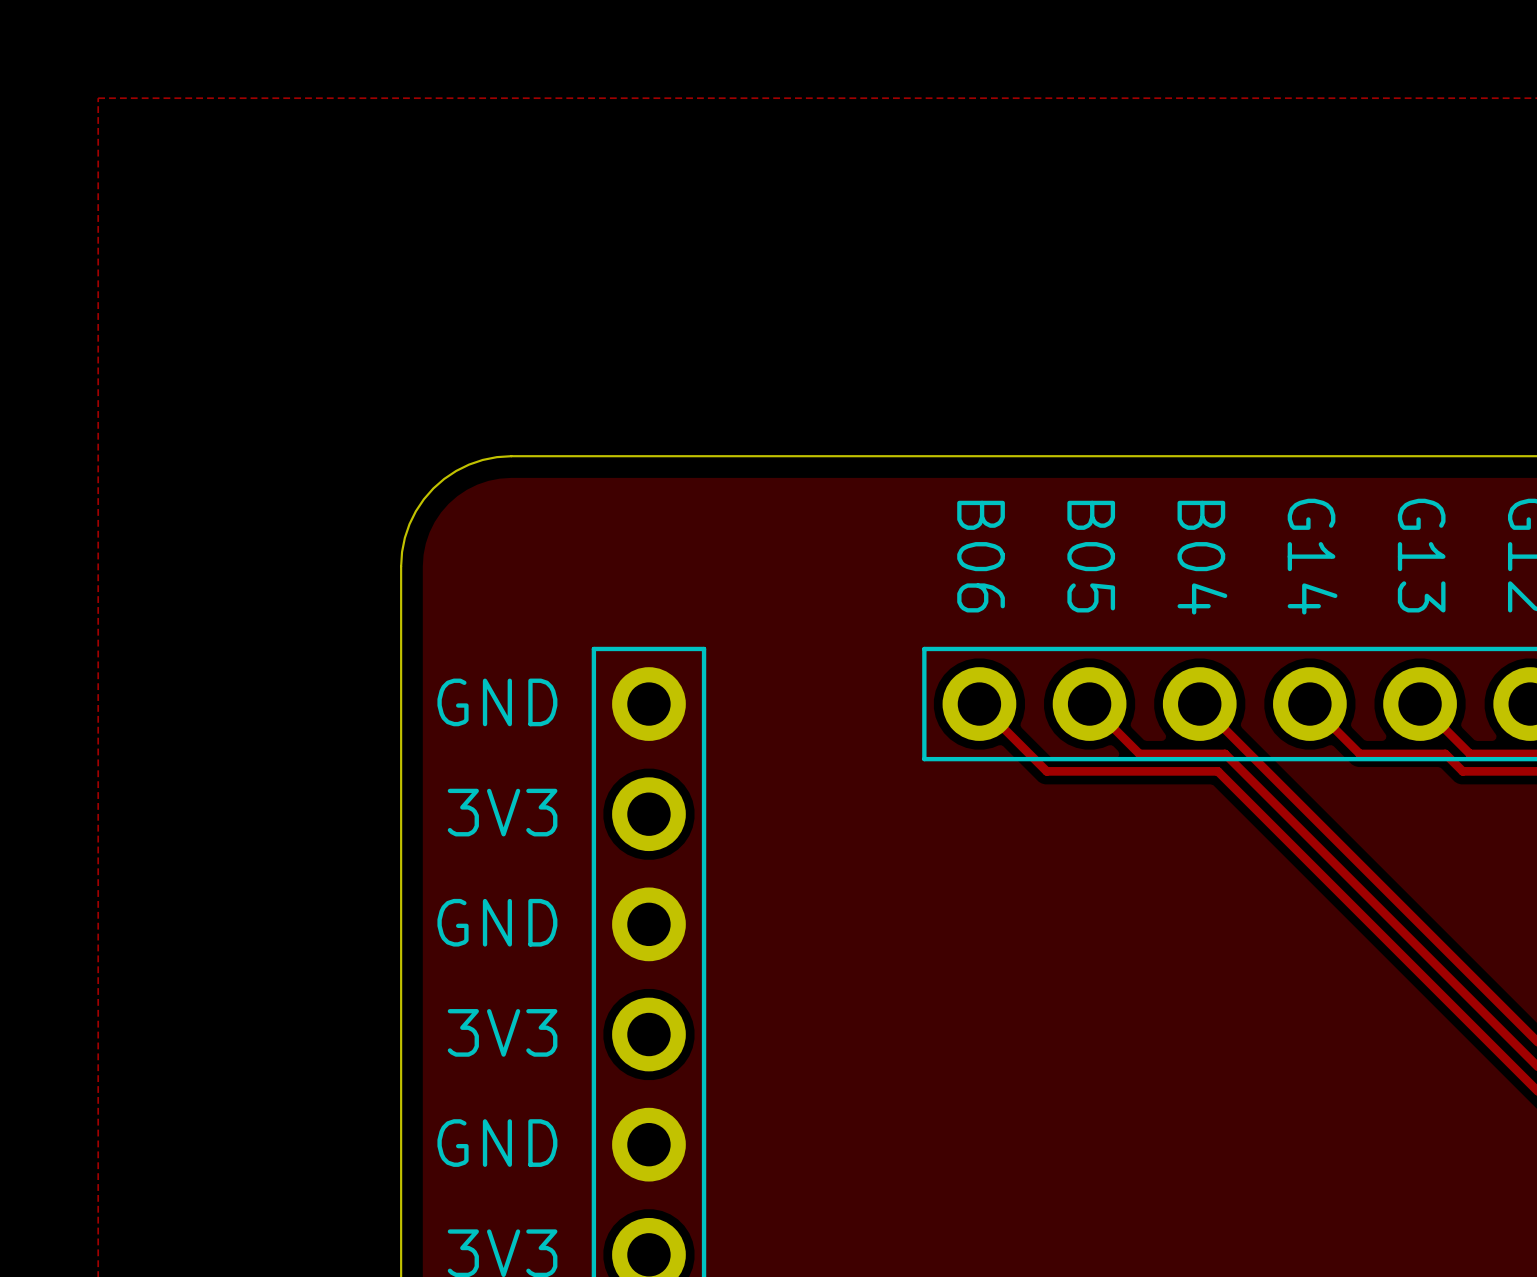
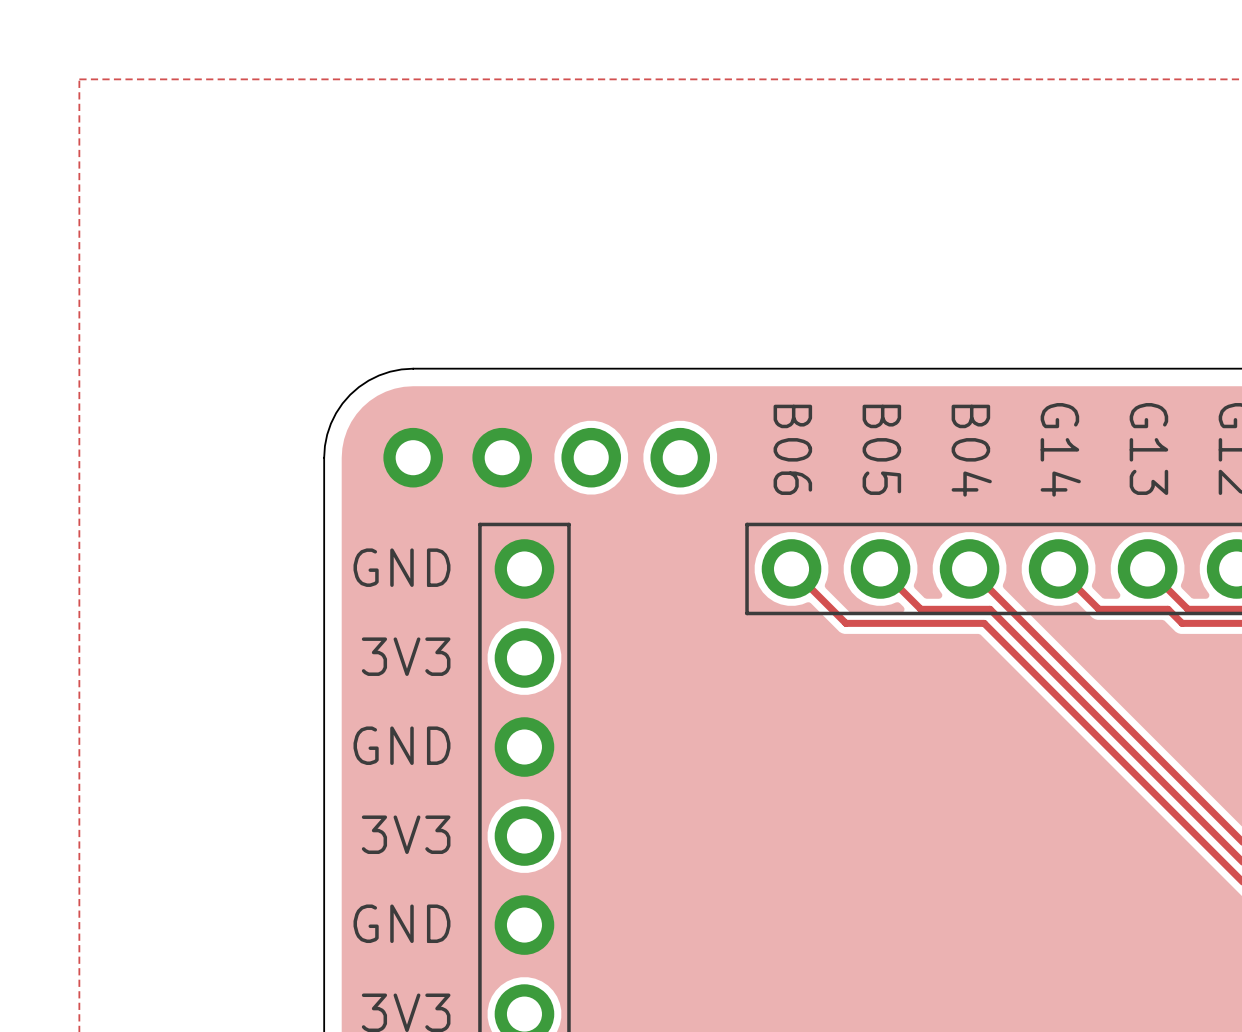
part: none -> (413, 457)
part: none -> (502, 457)
part: none -> (591, 457)
part: none -> (680, 457)

